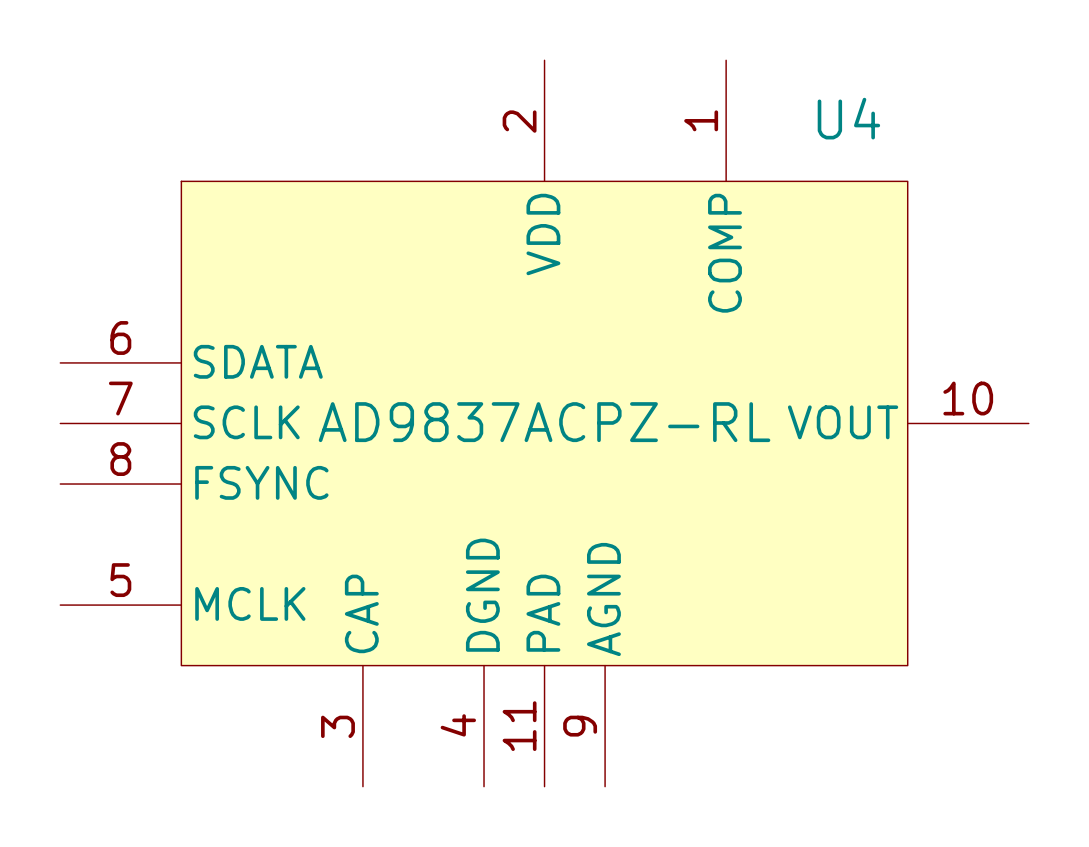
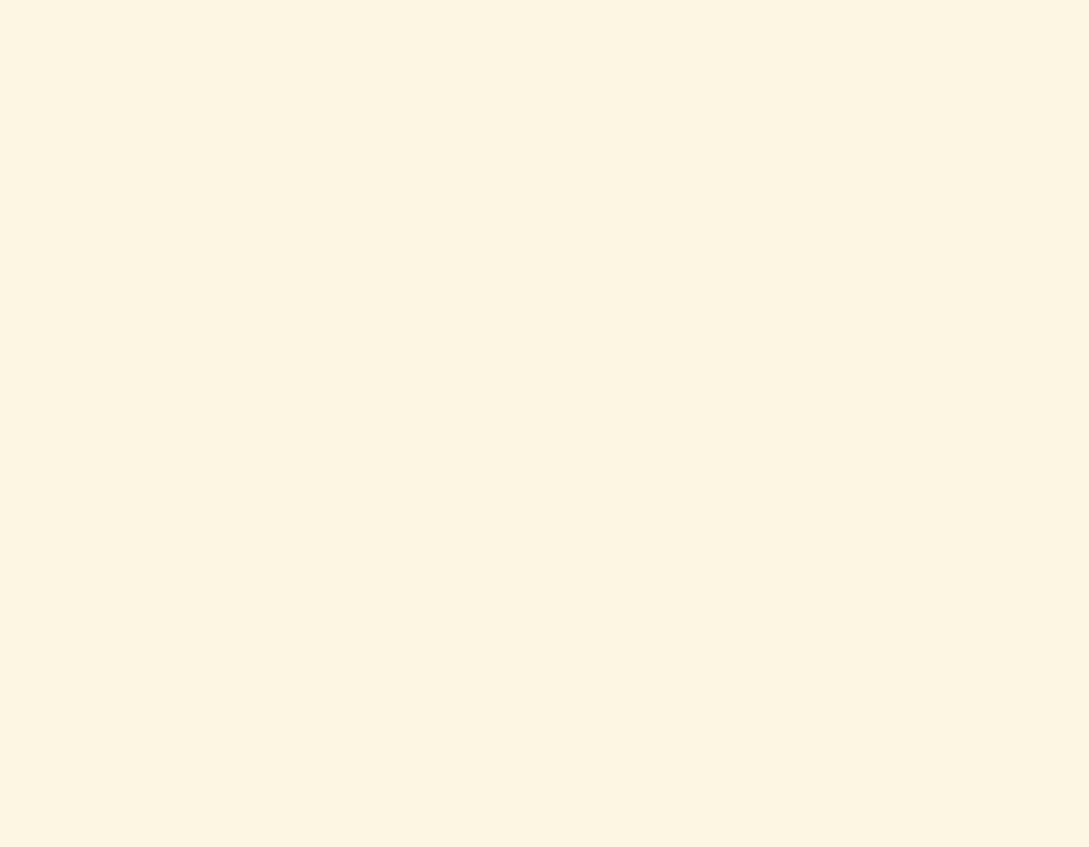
U4: AD9837ACPZ-RL (544, 423) -> none

